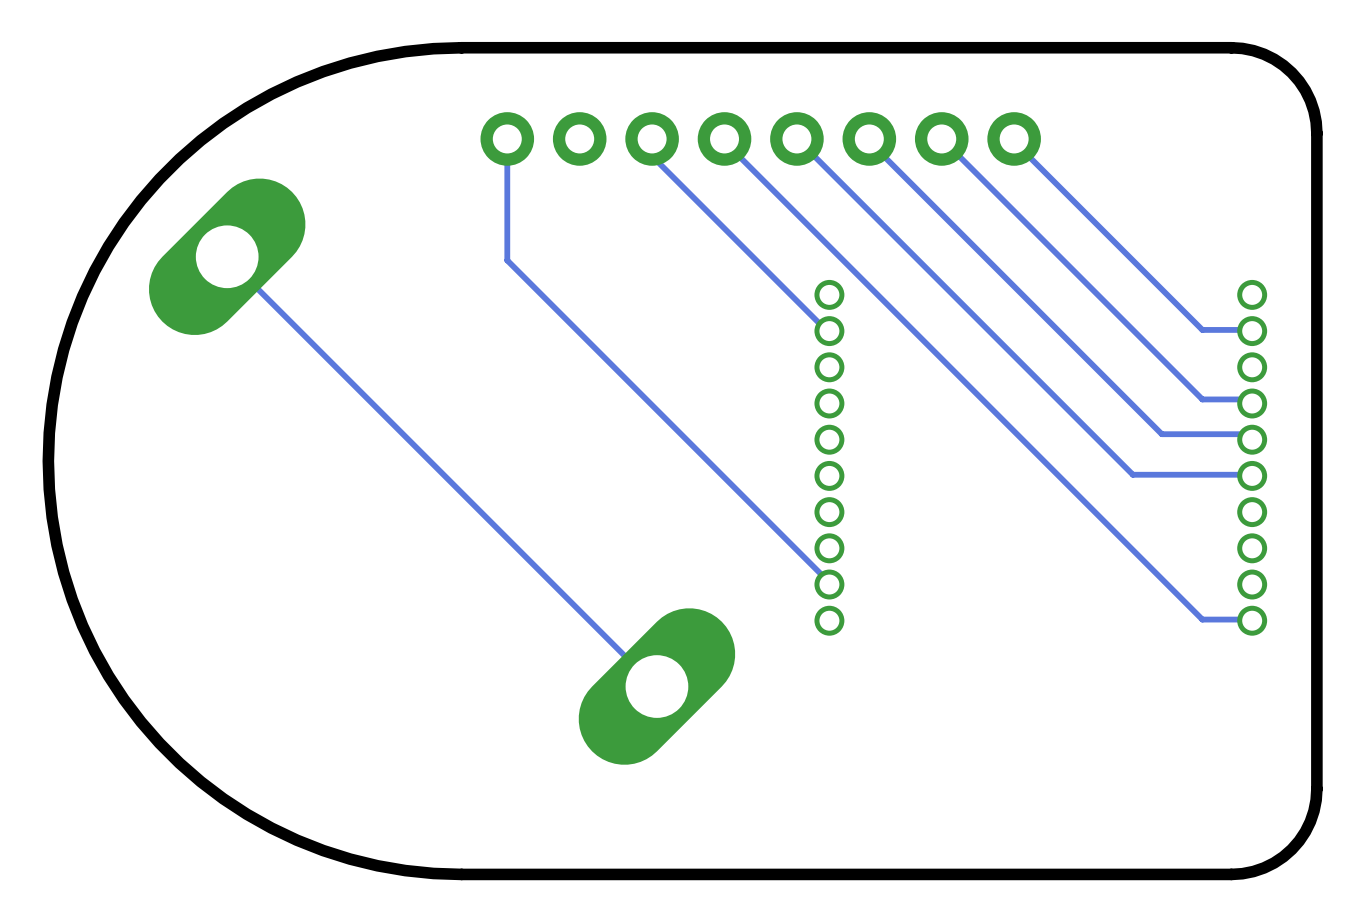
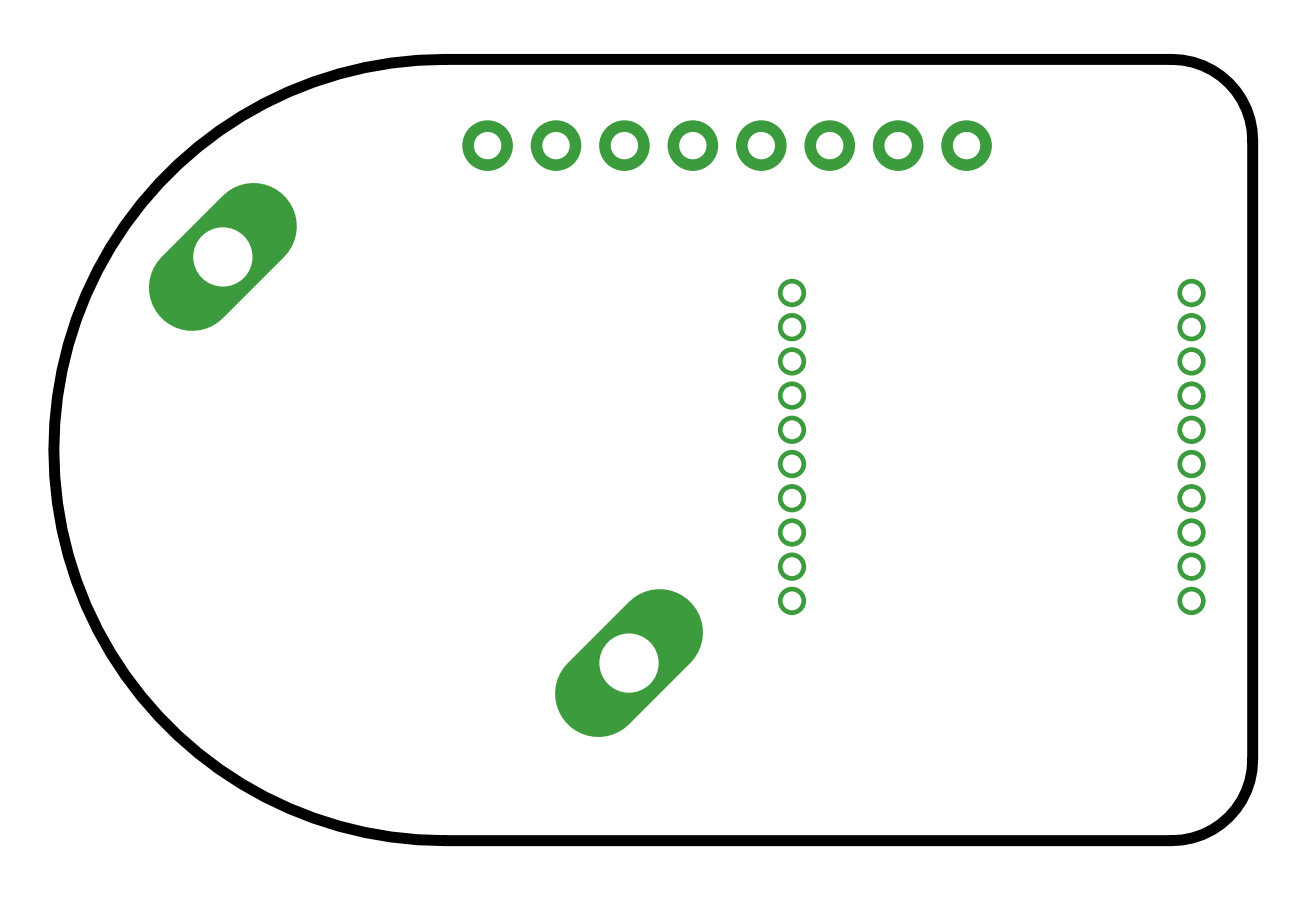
track: (507, 138) (507, 260) (829, 584) -> none
track: (652, 138) (652, 156) (825, 329) (829, 331) -> none
track: (724, 138) (727, 144) (1202, 619) (1252, 620) -> none
track: (796, 138) (1132, 474) (1252, 475) -> none
track: (869, 138) (872, 144) (1161, 434) (1248, 434) (1252, 439) -> none
track: (941, 138) (1202, 399) (1248, 399) (1252, 403) -> none
track: (1014, 138) (1017, 144) (1202, 329) (1252, 331) -> none
track: (227, 256) (656, 686) -> none

